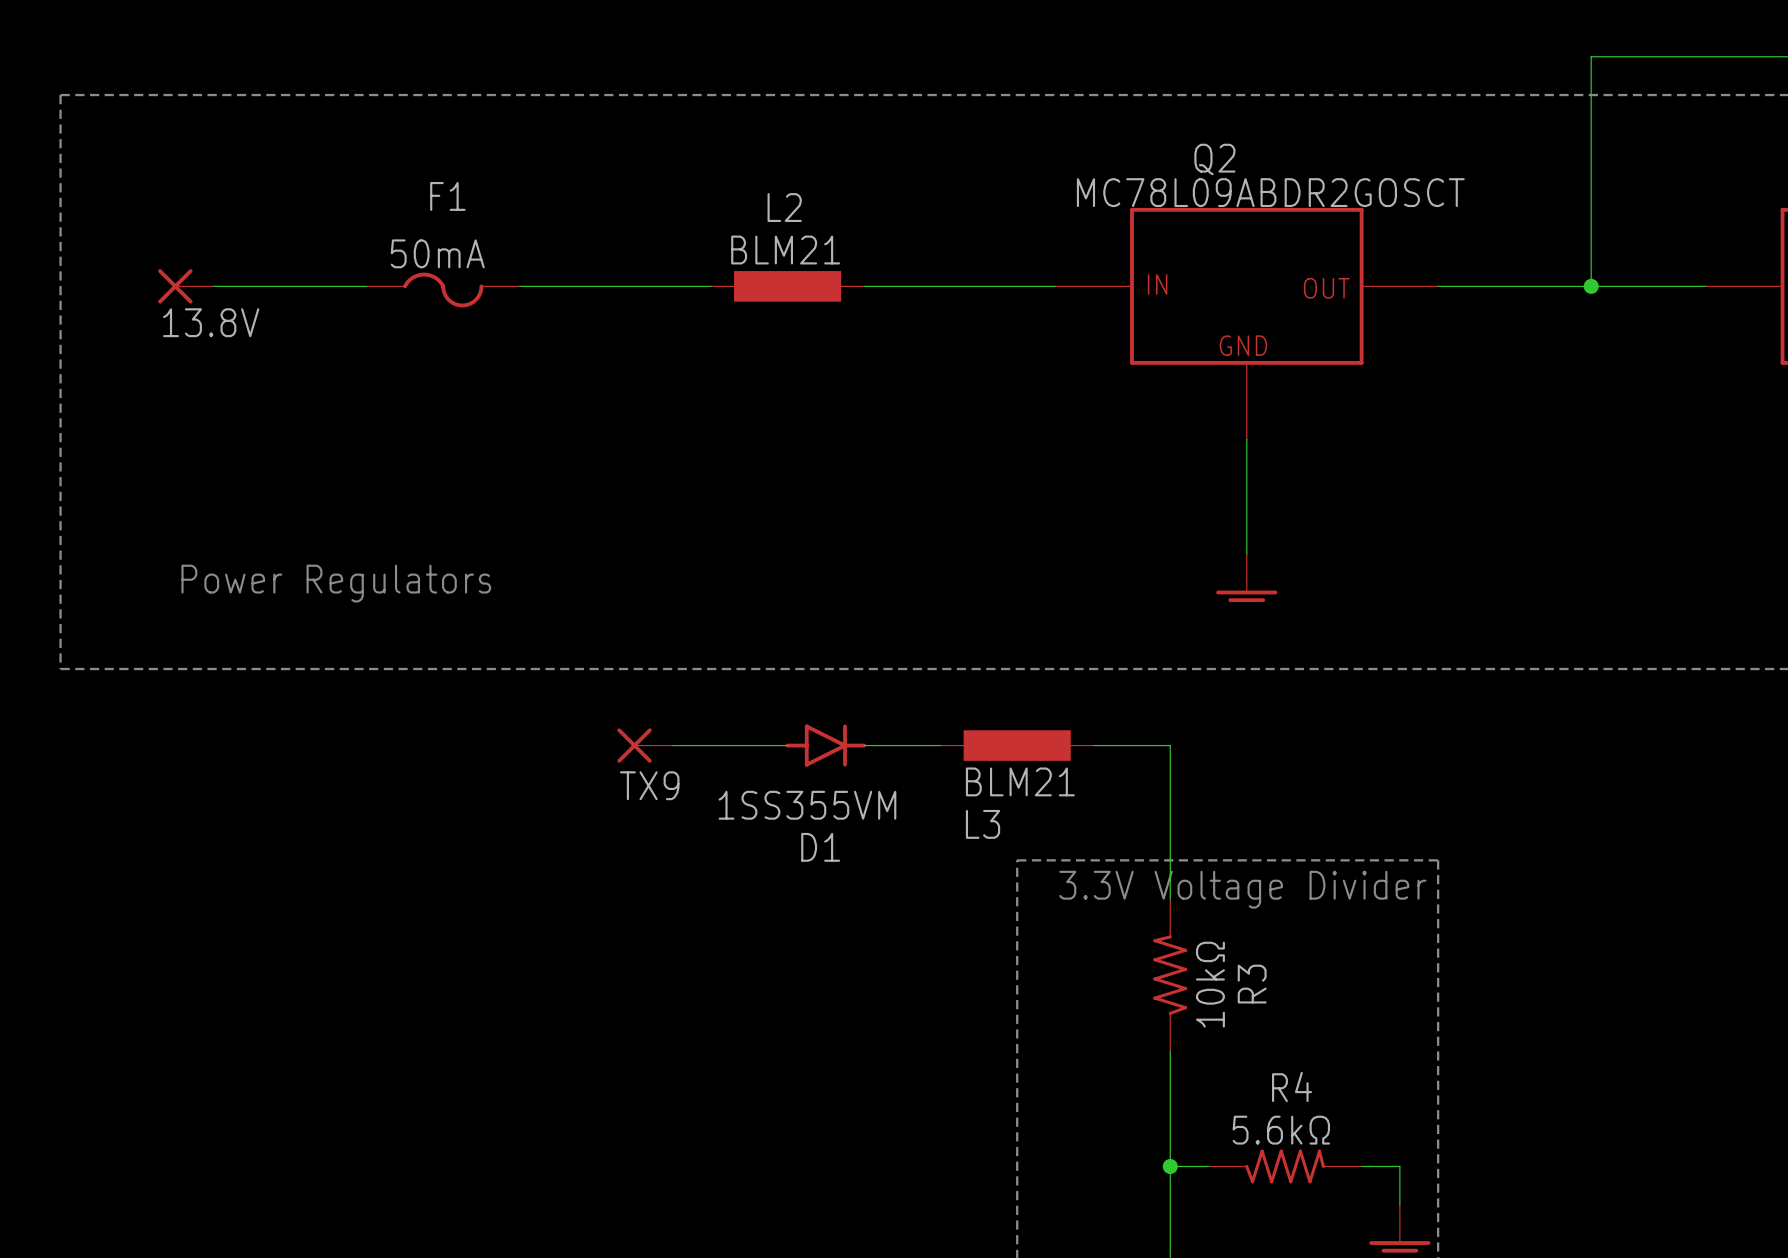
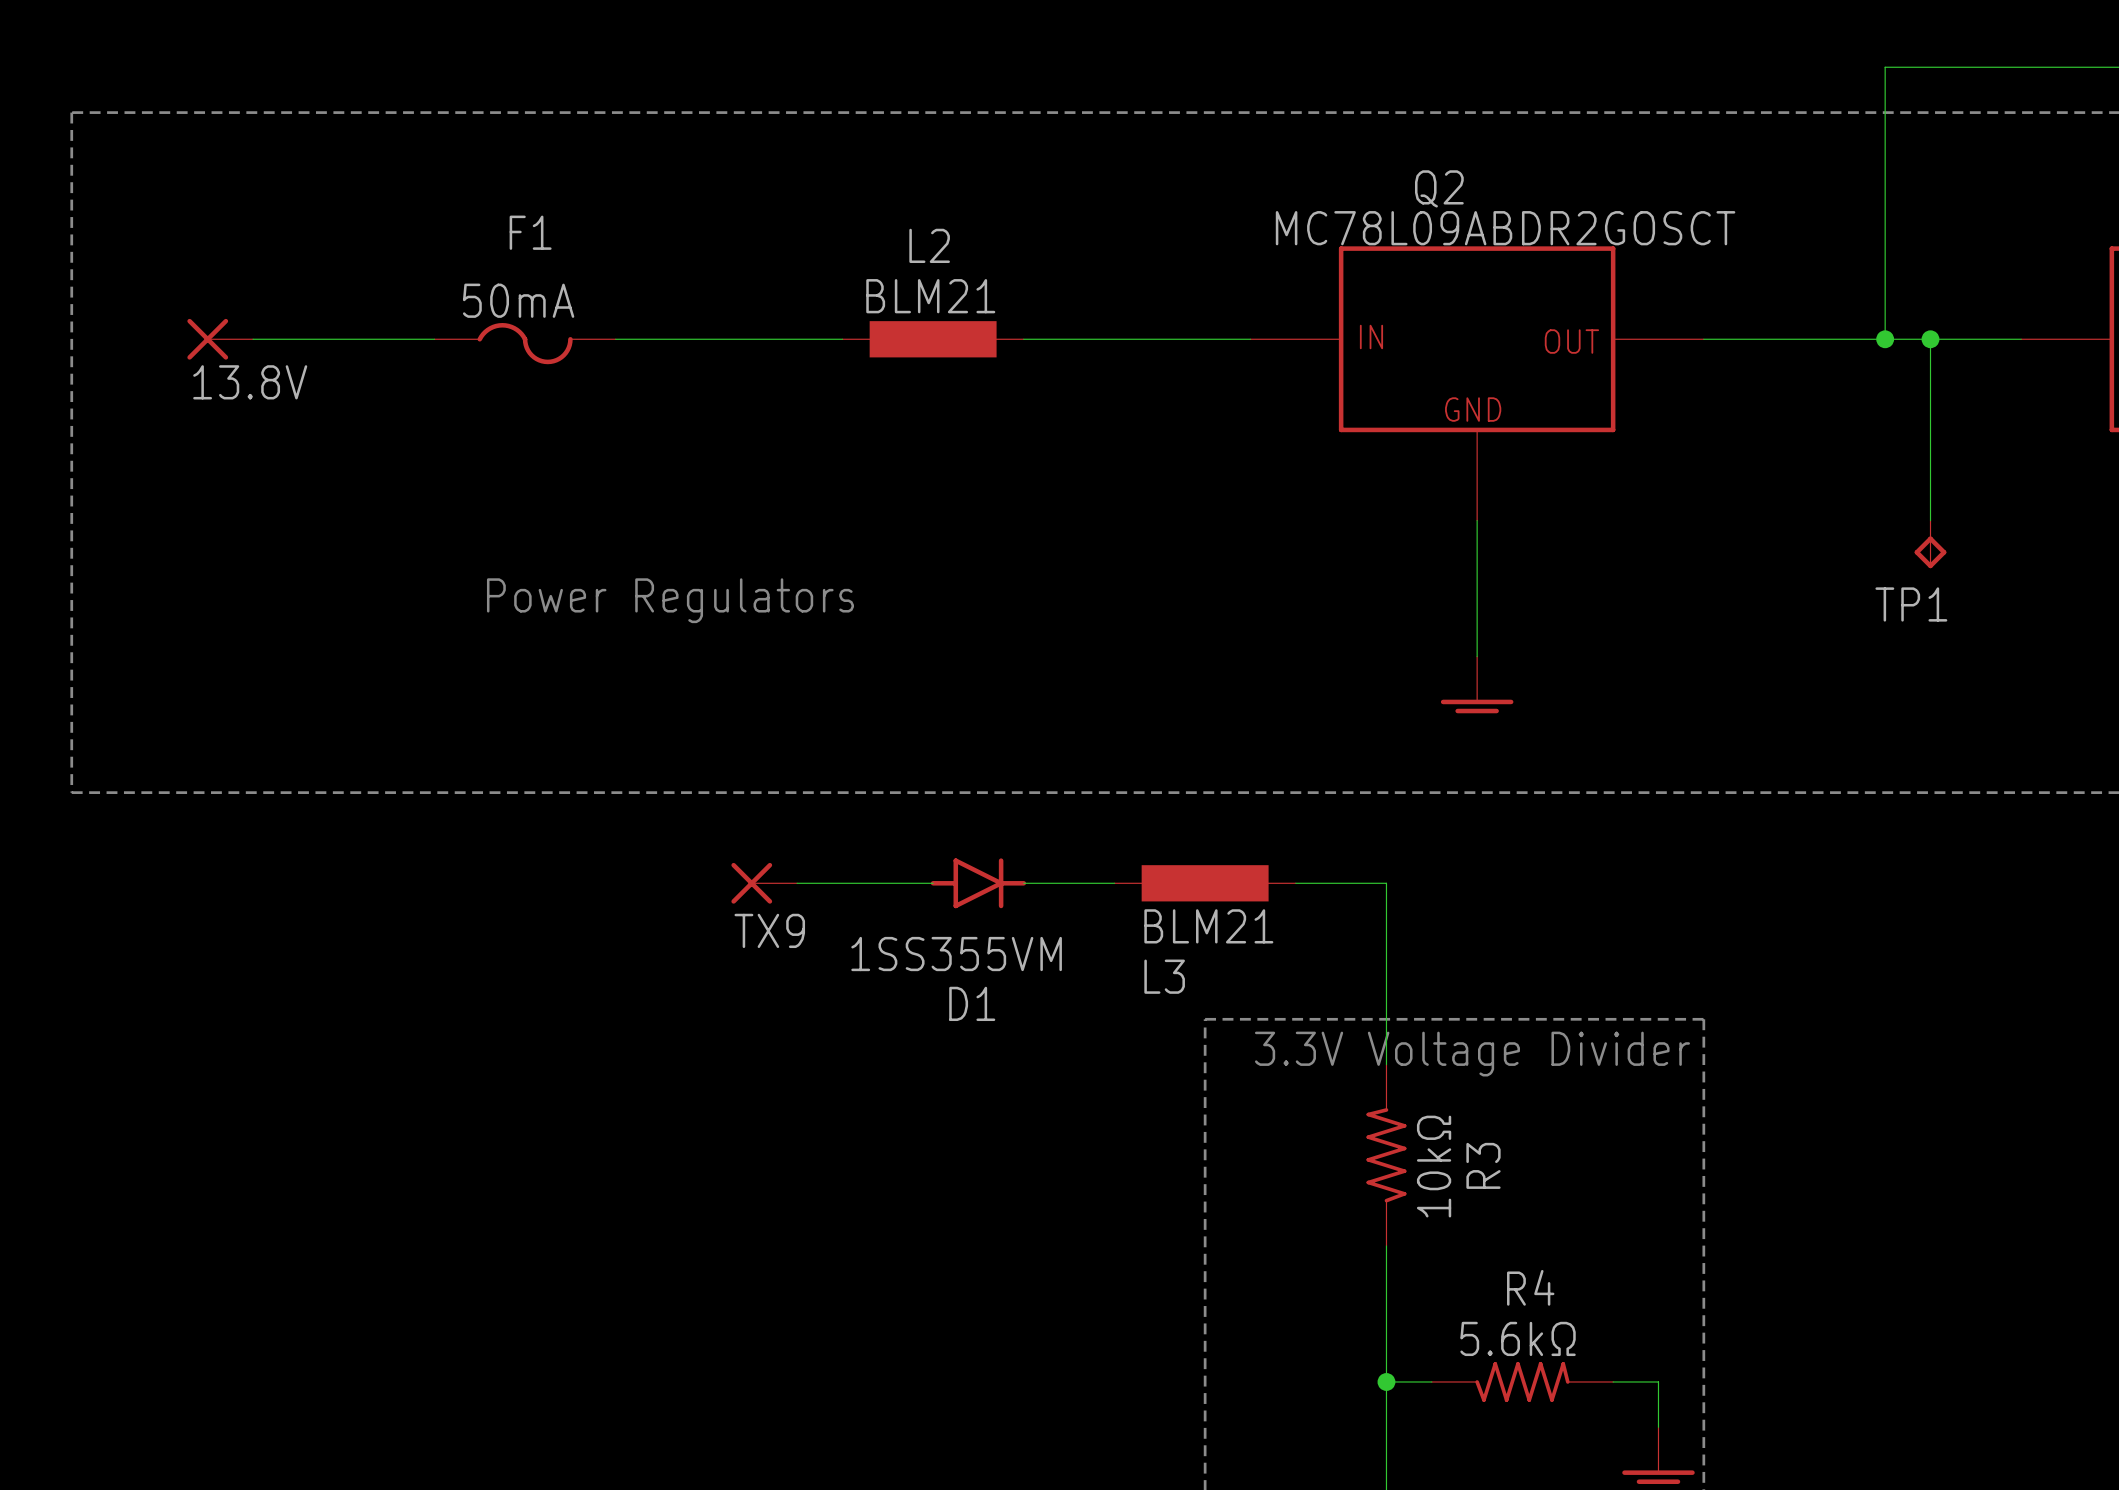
wire: none -> (1930, 339) (1930, 520)
junction: none -> (1930, 339)
TP1: none -> (1930, 544)
text position: Power Regulators (336, 583) -> Power Regulators (670, 600)

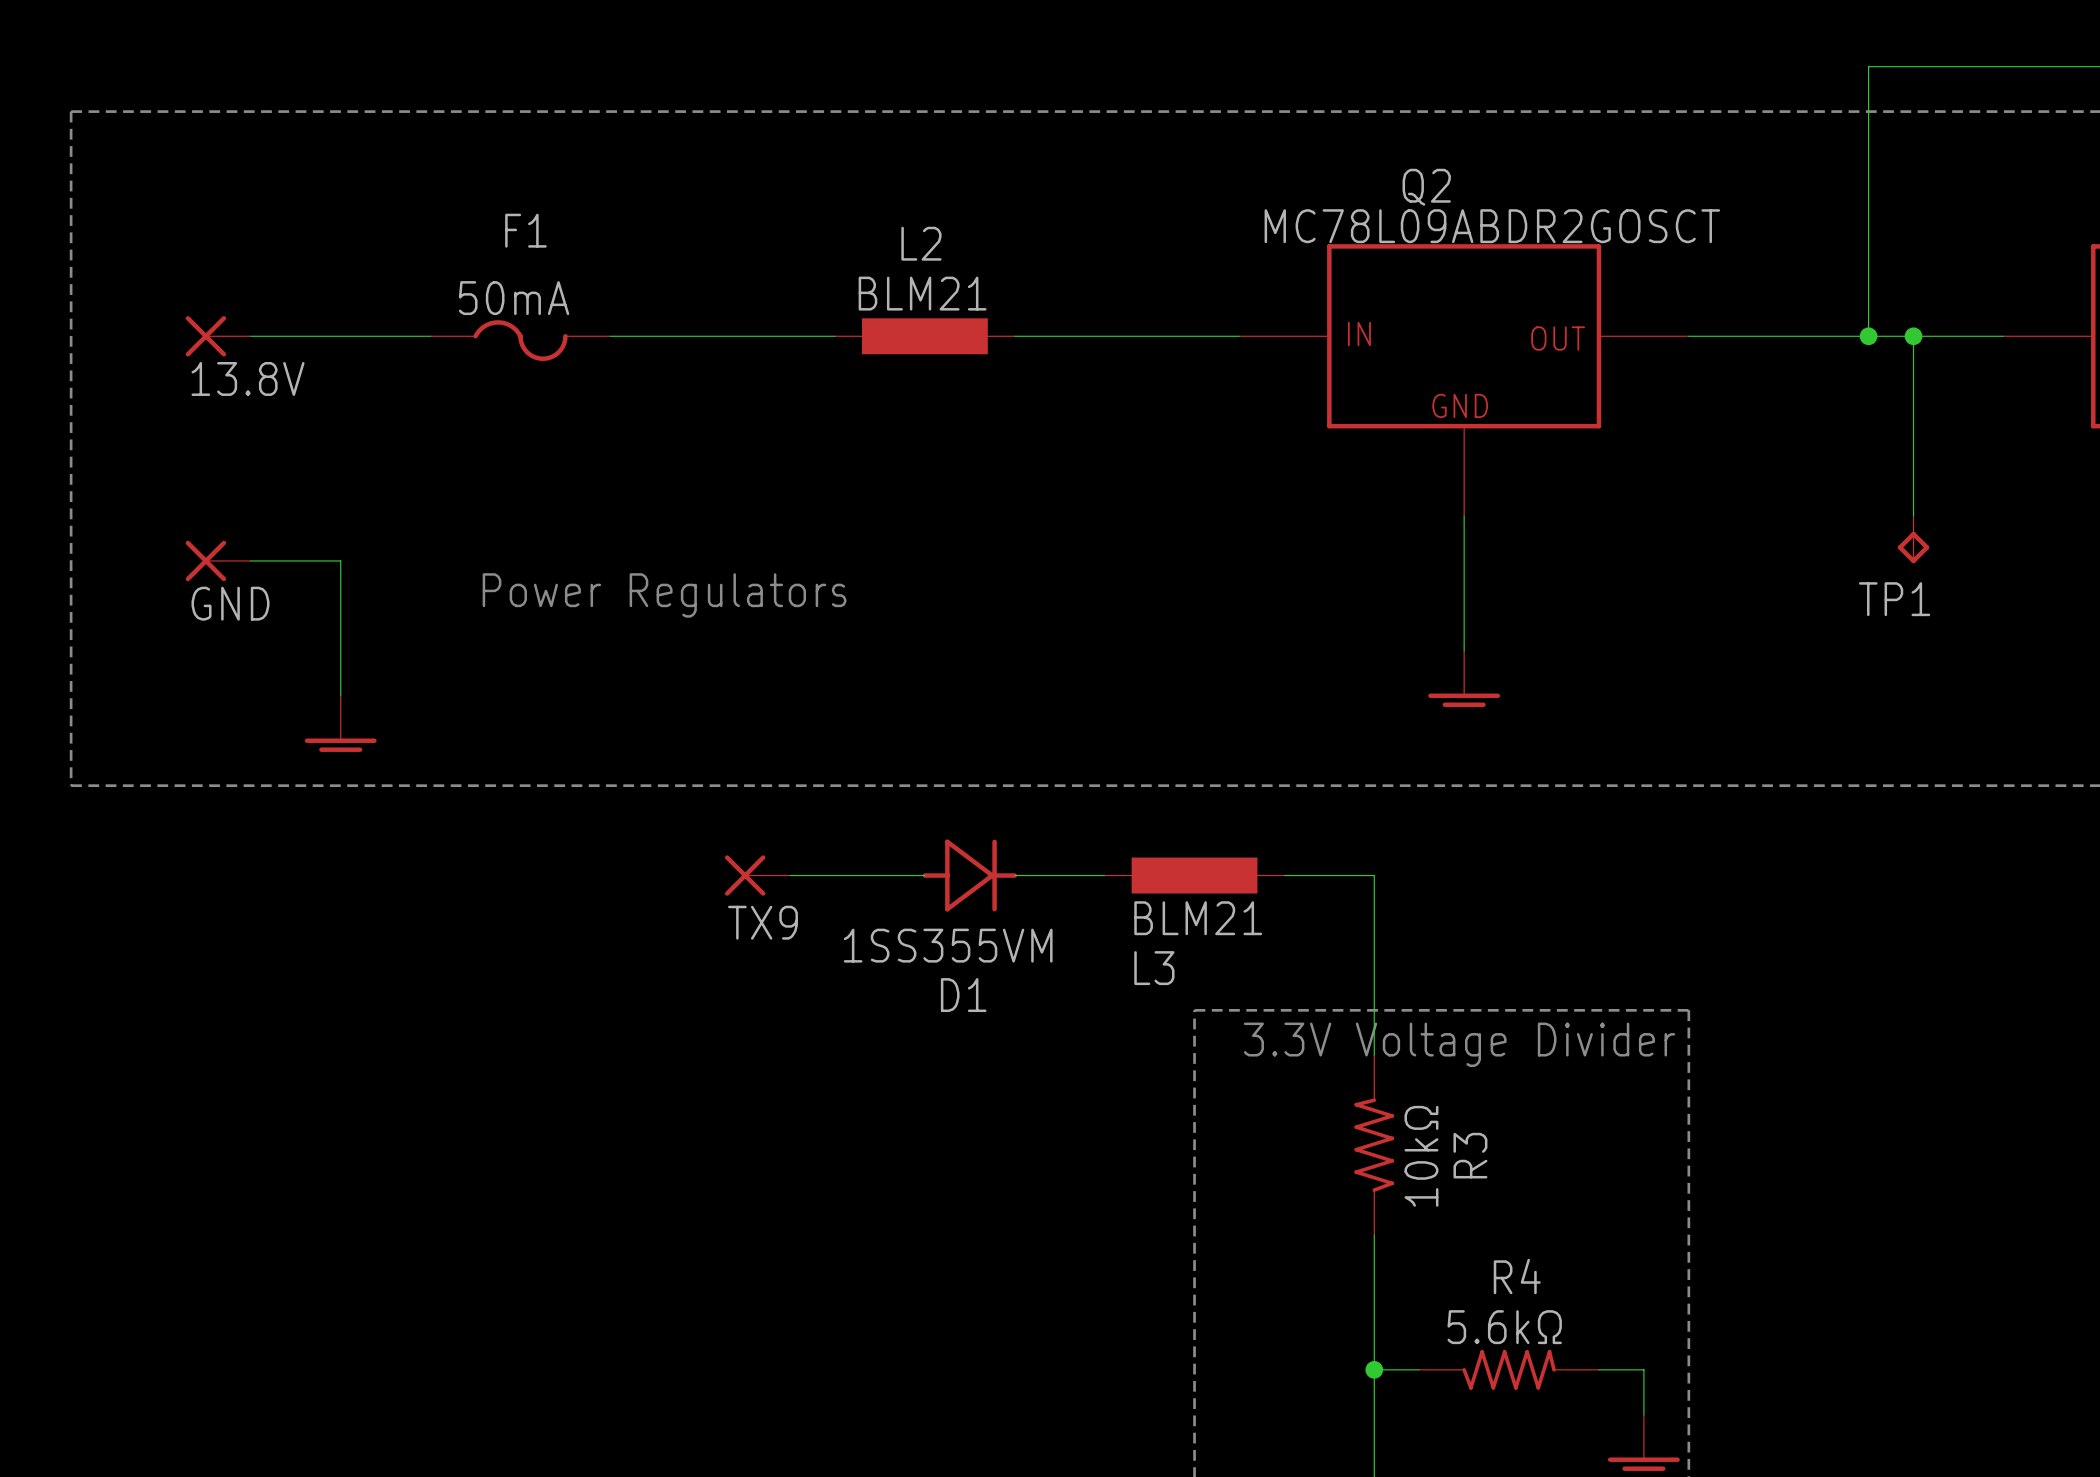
part: none -> GND (218, 560)
wire: none -> (250, 560) (340, 560) (340, 695)
power symbol: none -> (340, 723)
D1 symbol: [930, 858, 1027, 909] -> [922, 839, 1018, 912]

